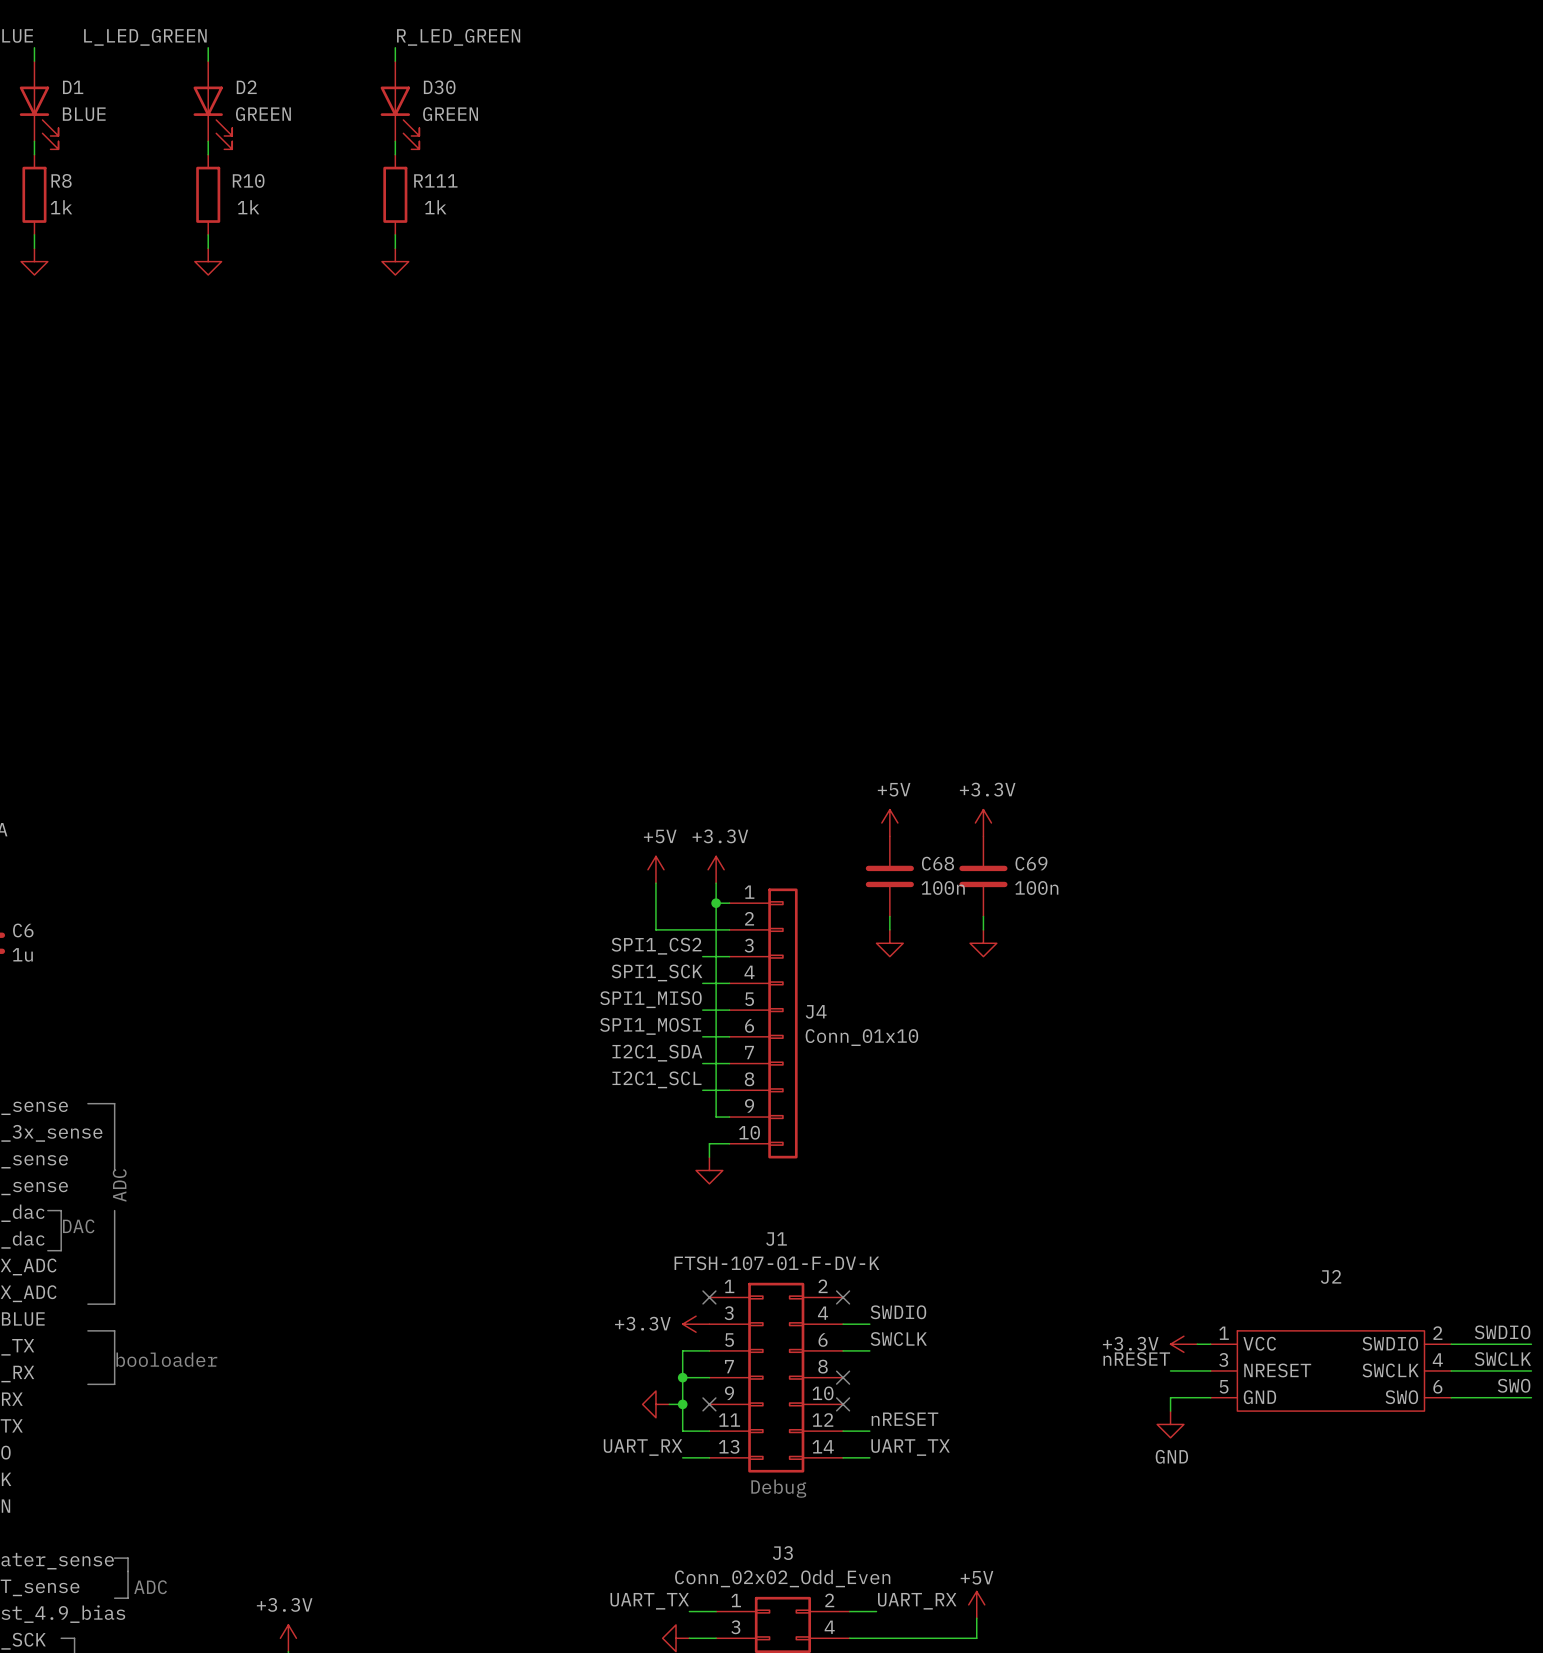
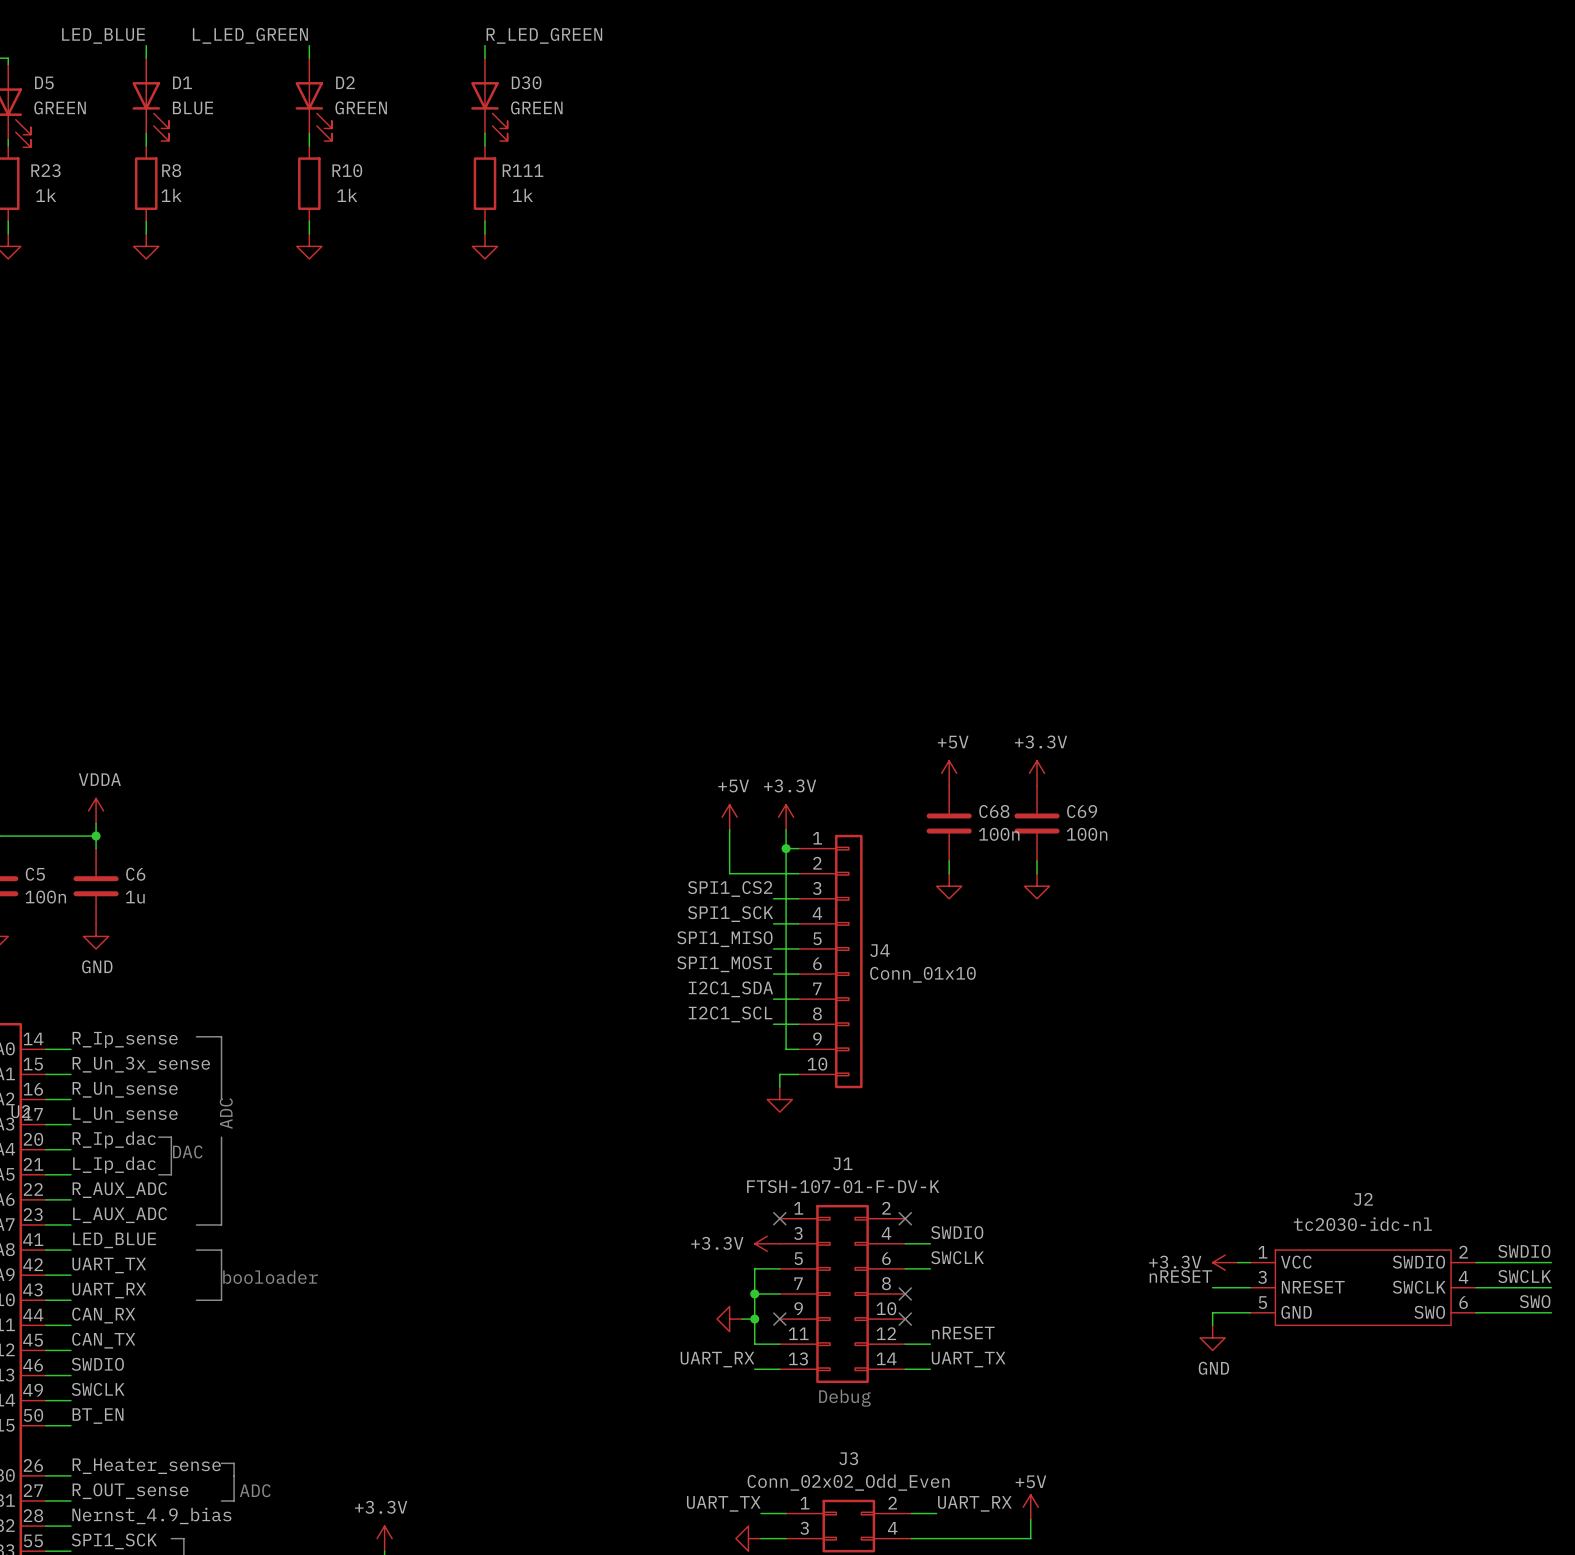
J2 value: none -> tc2030-idc-nl (1362, 1224)

